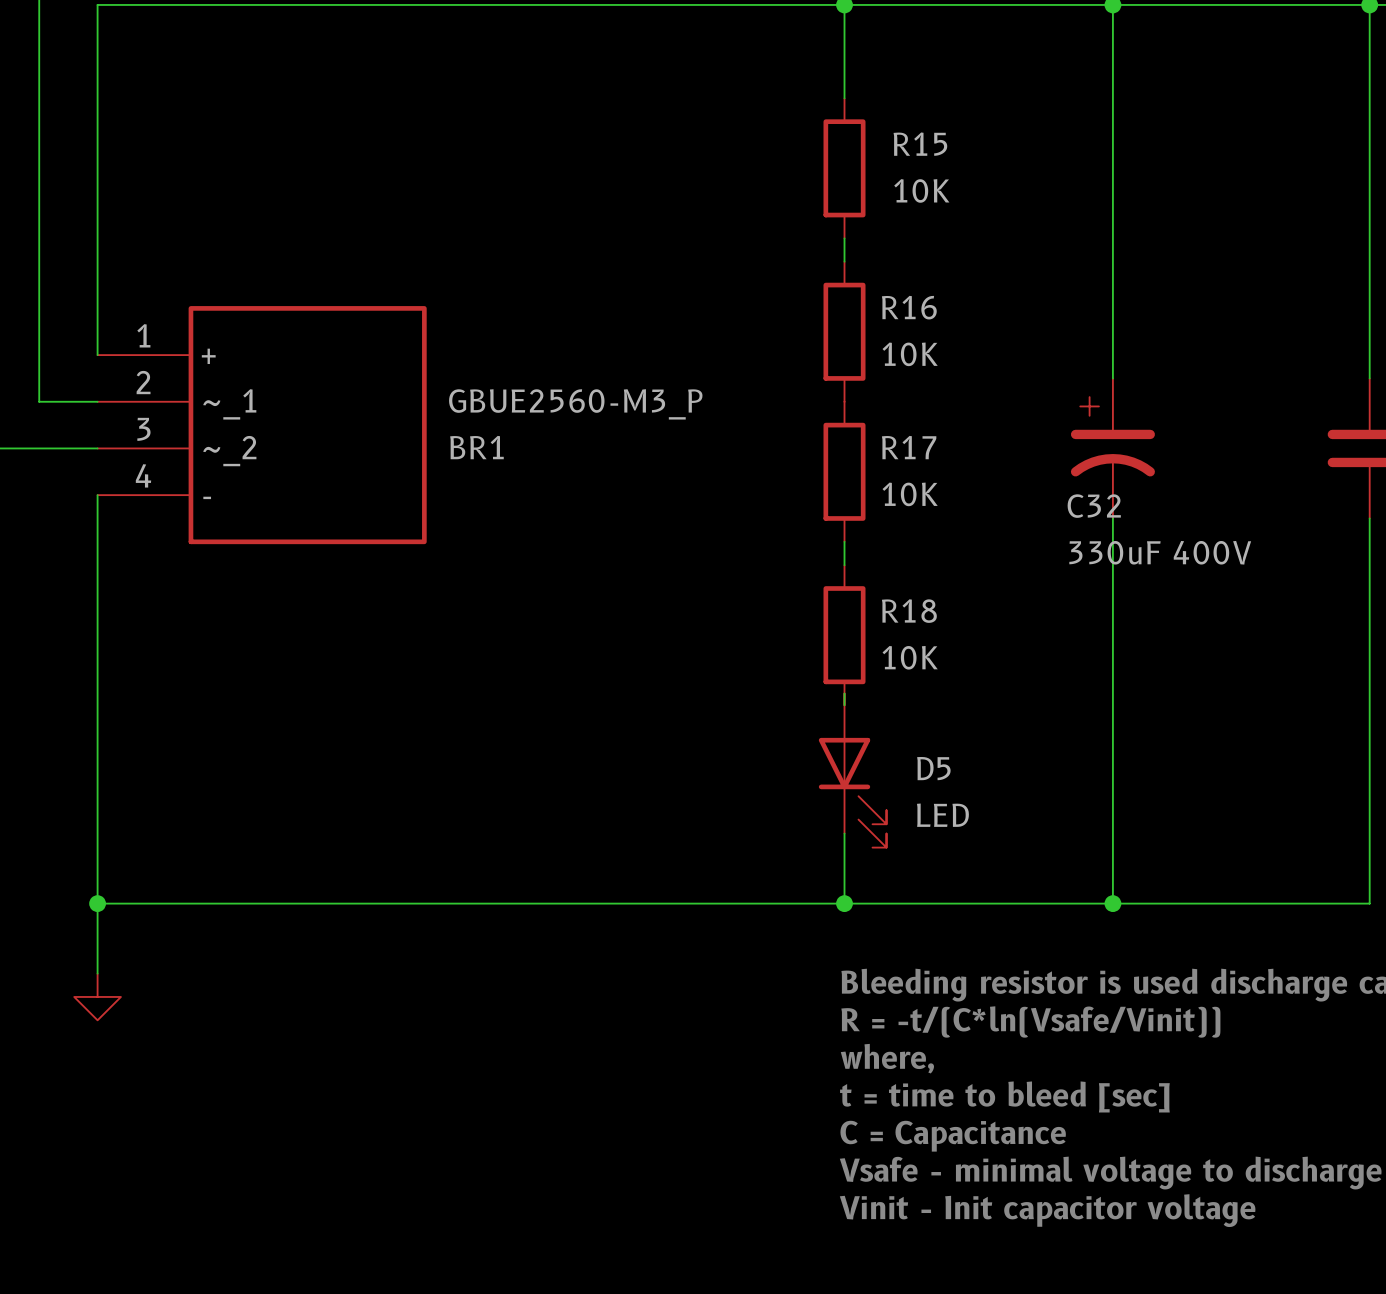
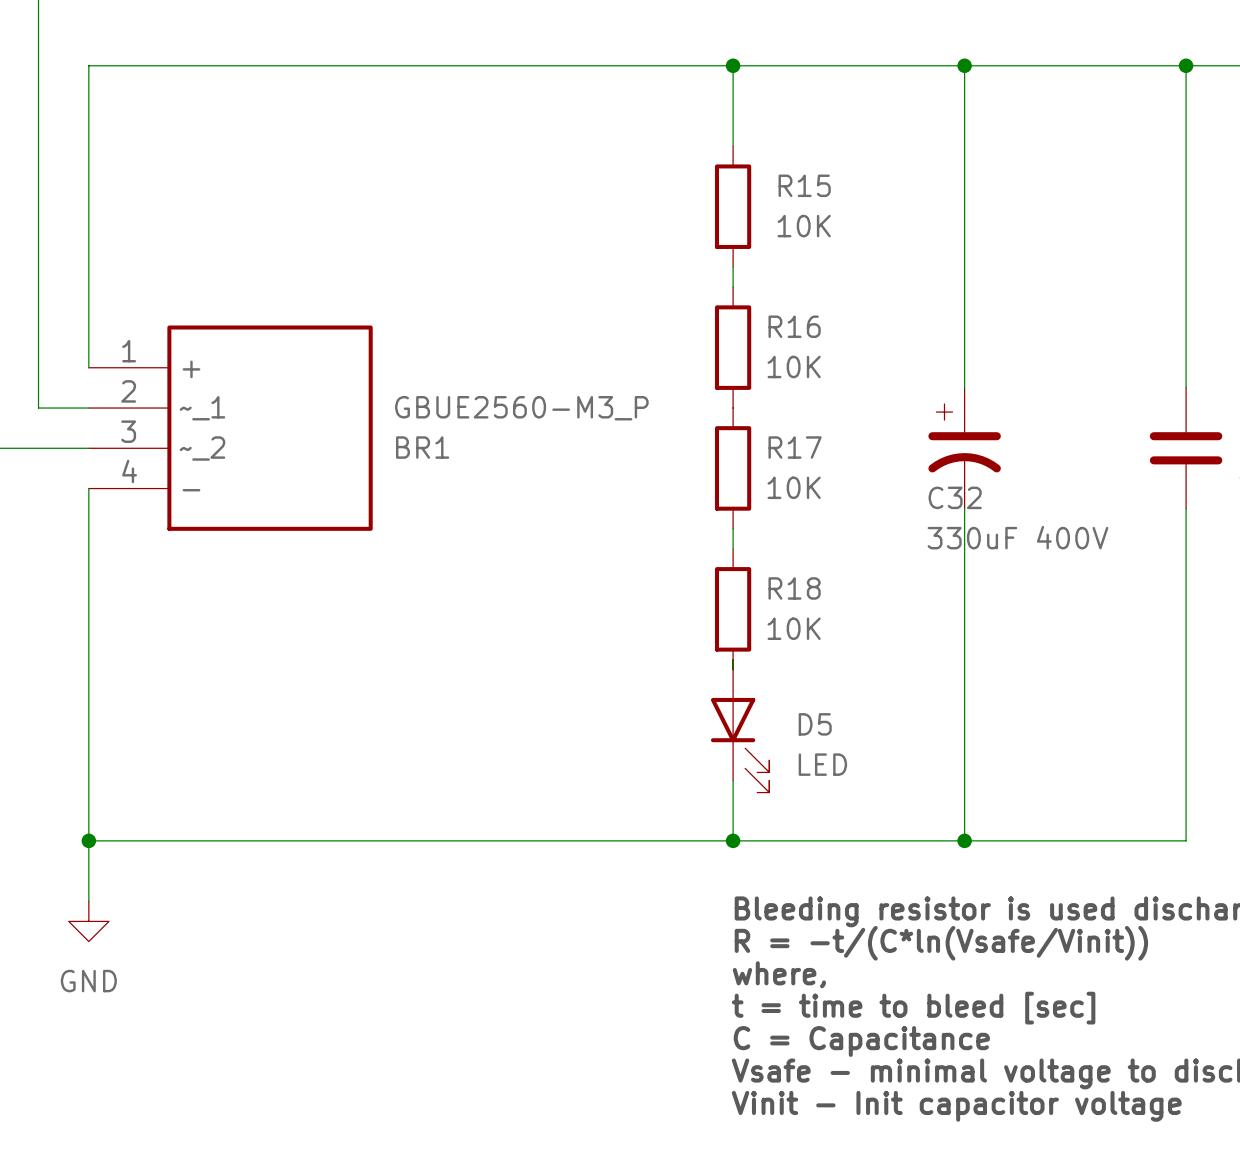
power symbol text: none -> GND (88, 981)

